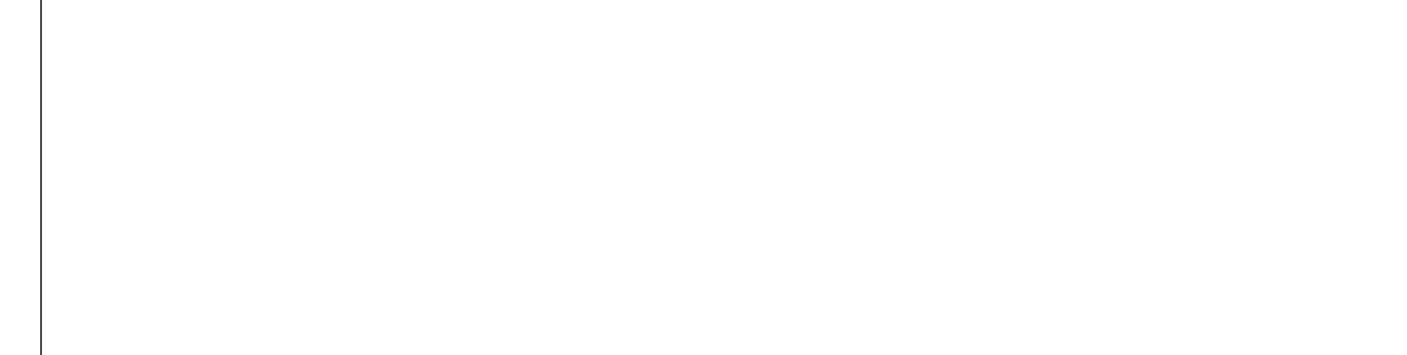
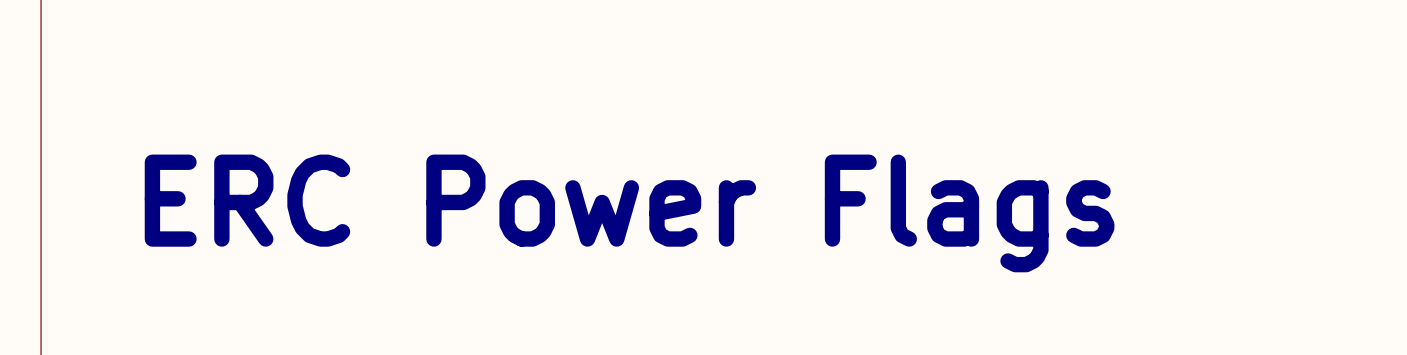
text: none -> ERC Power Flags (629, 213)

